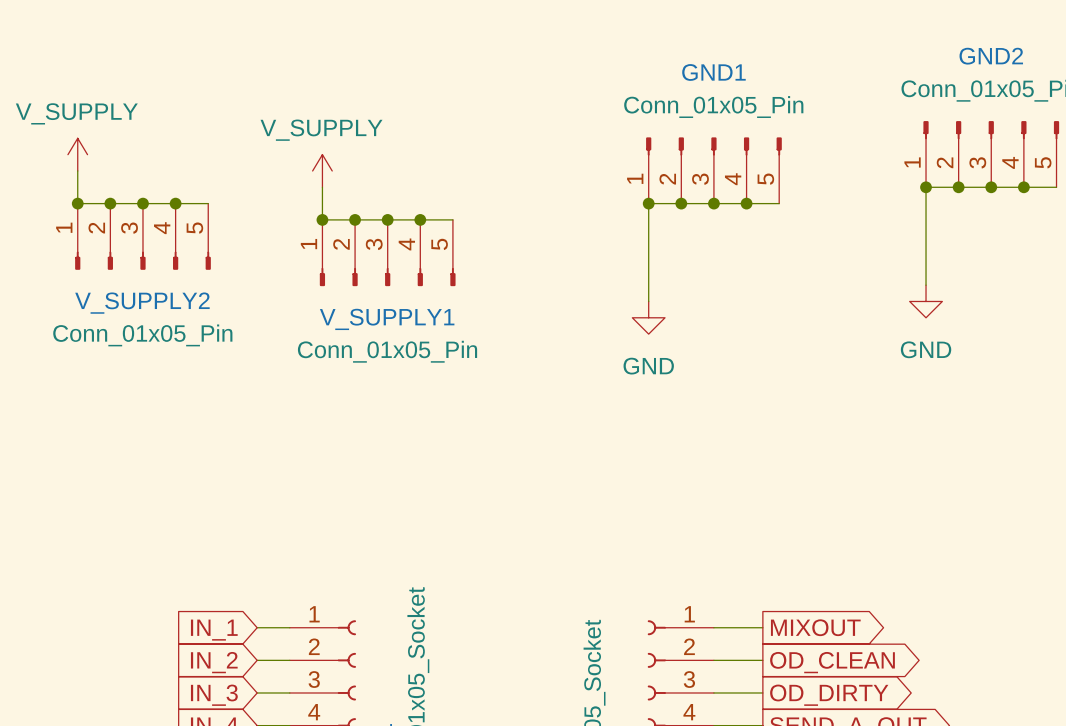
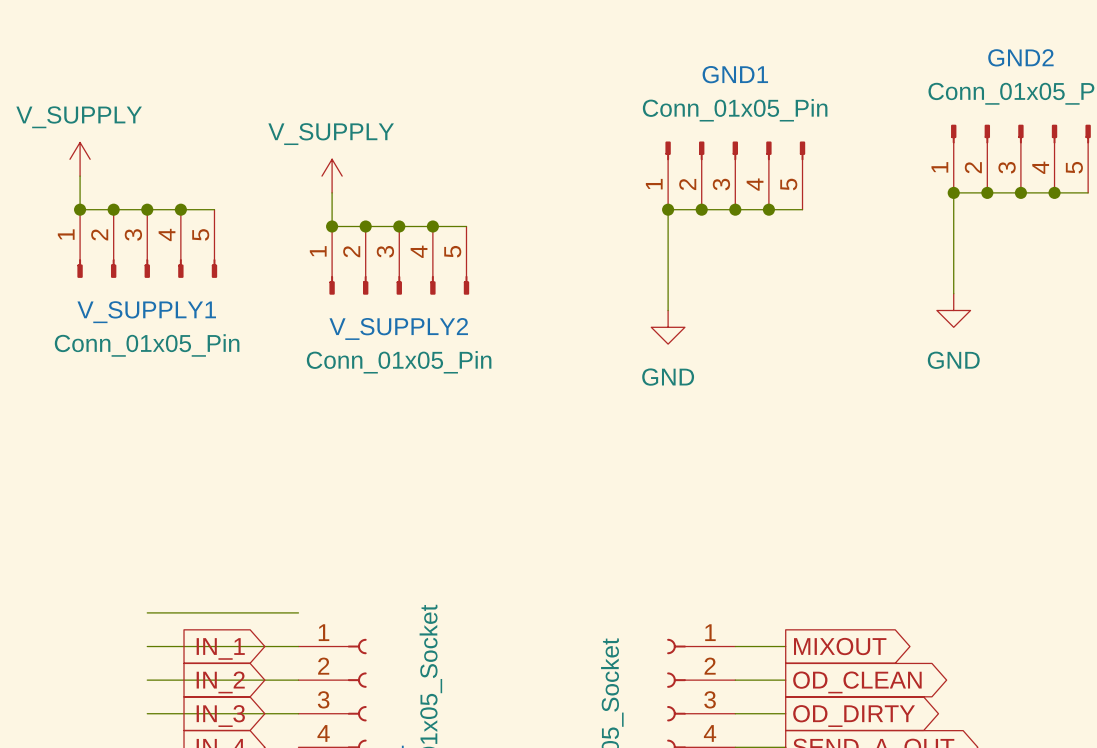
V_SUPPLY2 name: V_SUPPLY2 (142, 303) -> V_SUPPLY1 (146, 312)
V_SUPPLY1 name: V_SUPPLY1 (387, 319) -> V_SUPPLY2 (398, 328)
wire: none -> (147, 612) (298, 612)
wire: none -> (147, 646) (264, 646)
wire: none -> (147, 680) (264, 680)
wire: none -> (147, 713) (264, 713)
wire: (257, 725) (289, 725) -> none

